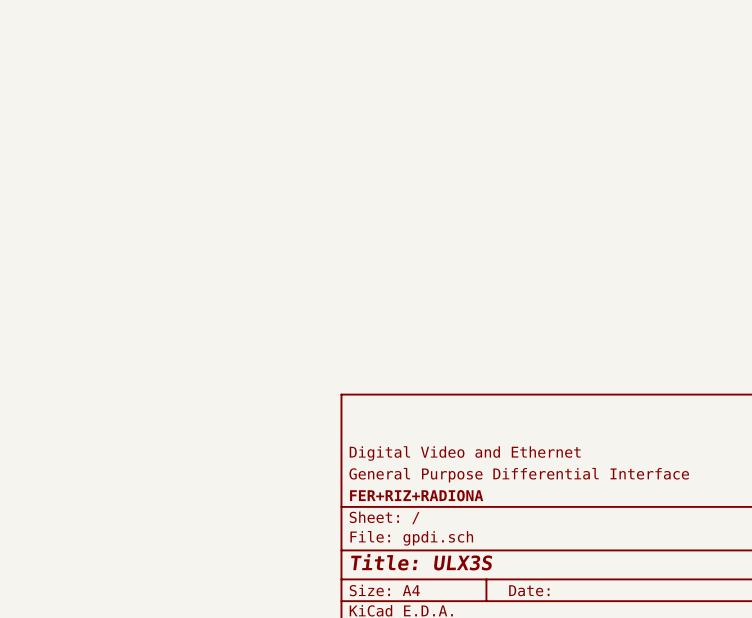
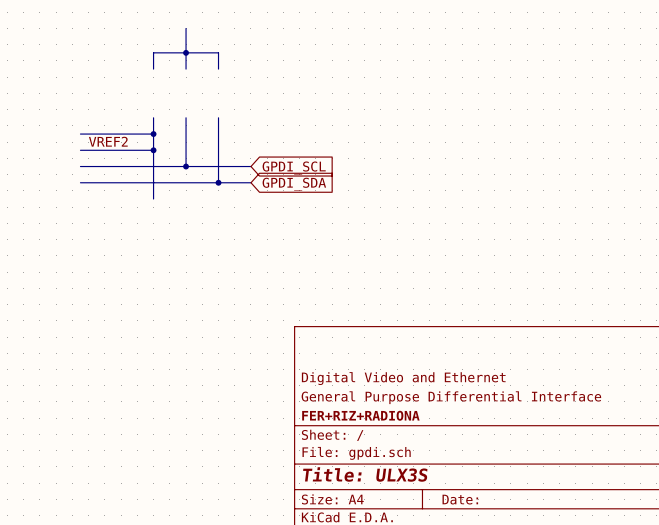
wire: none -> (186, 28) (186, 69)
junction: none -> (186, 52)
wire: none -> (153, 69) (153, 52) (218, 52) (218, 69)
wire: none -> (153, 117) (153, 199)
wire: none -> (186, 117) (186, 166)
wire: none -> (218, 117) (218, 182)
wire: none -> (80, 134) (153, 134)
junction: none -> (153, 134)
label: none -> VREF2 (108, 141)
wire: none -> (80, 150) (153, 150)
junction: none -> (153, 150)
wire: none -> (80, 166) (250, 166)
junction: none -> (186, 166)
global label: none -> GPDI_SCL (294, 168)
wire: none -> (80, 182) (250, 182)
junction: none -> (218, 182)
global label: none -> GPDI_SDA (294, 184)

